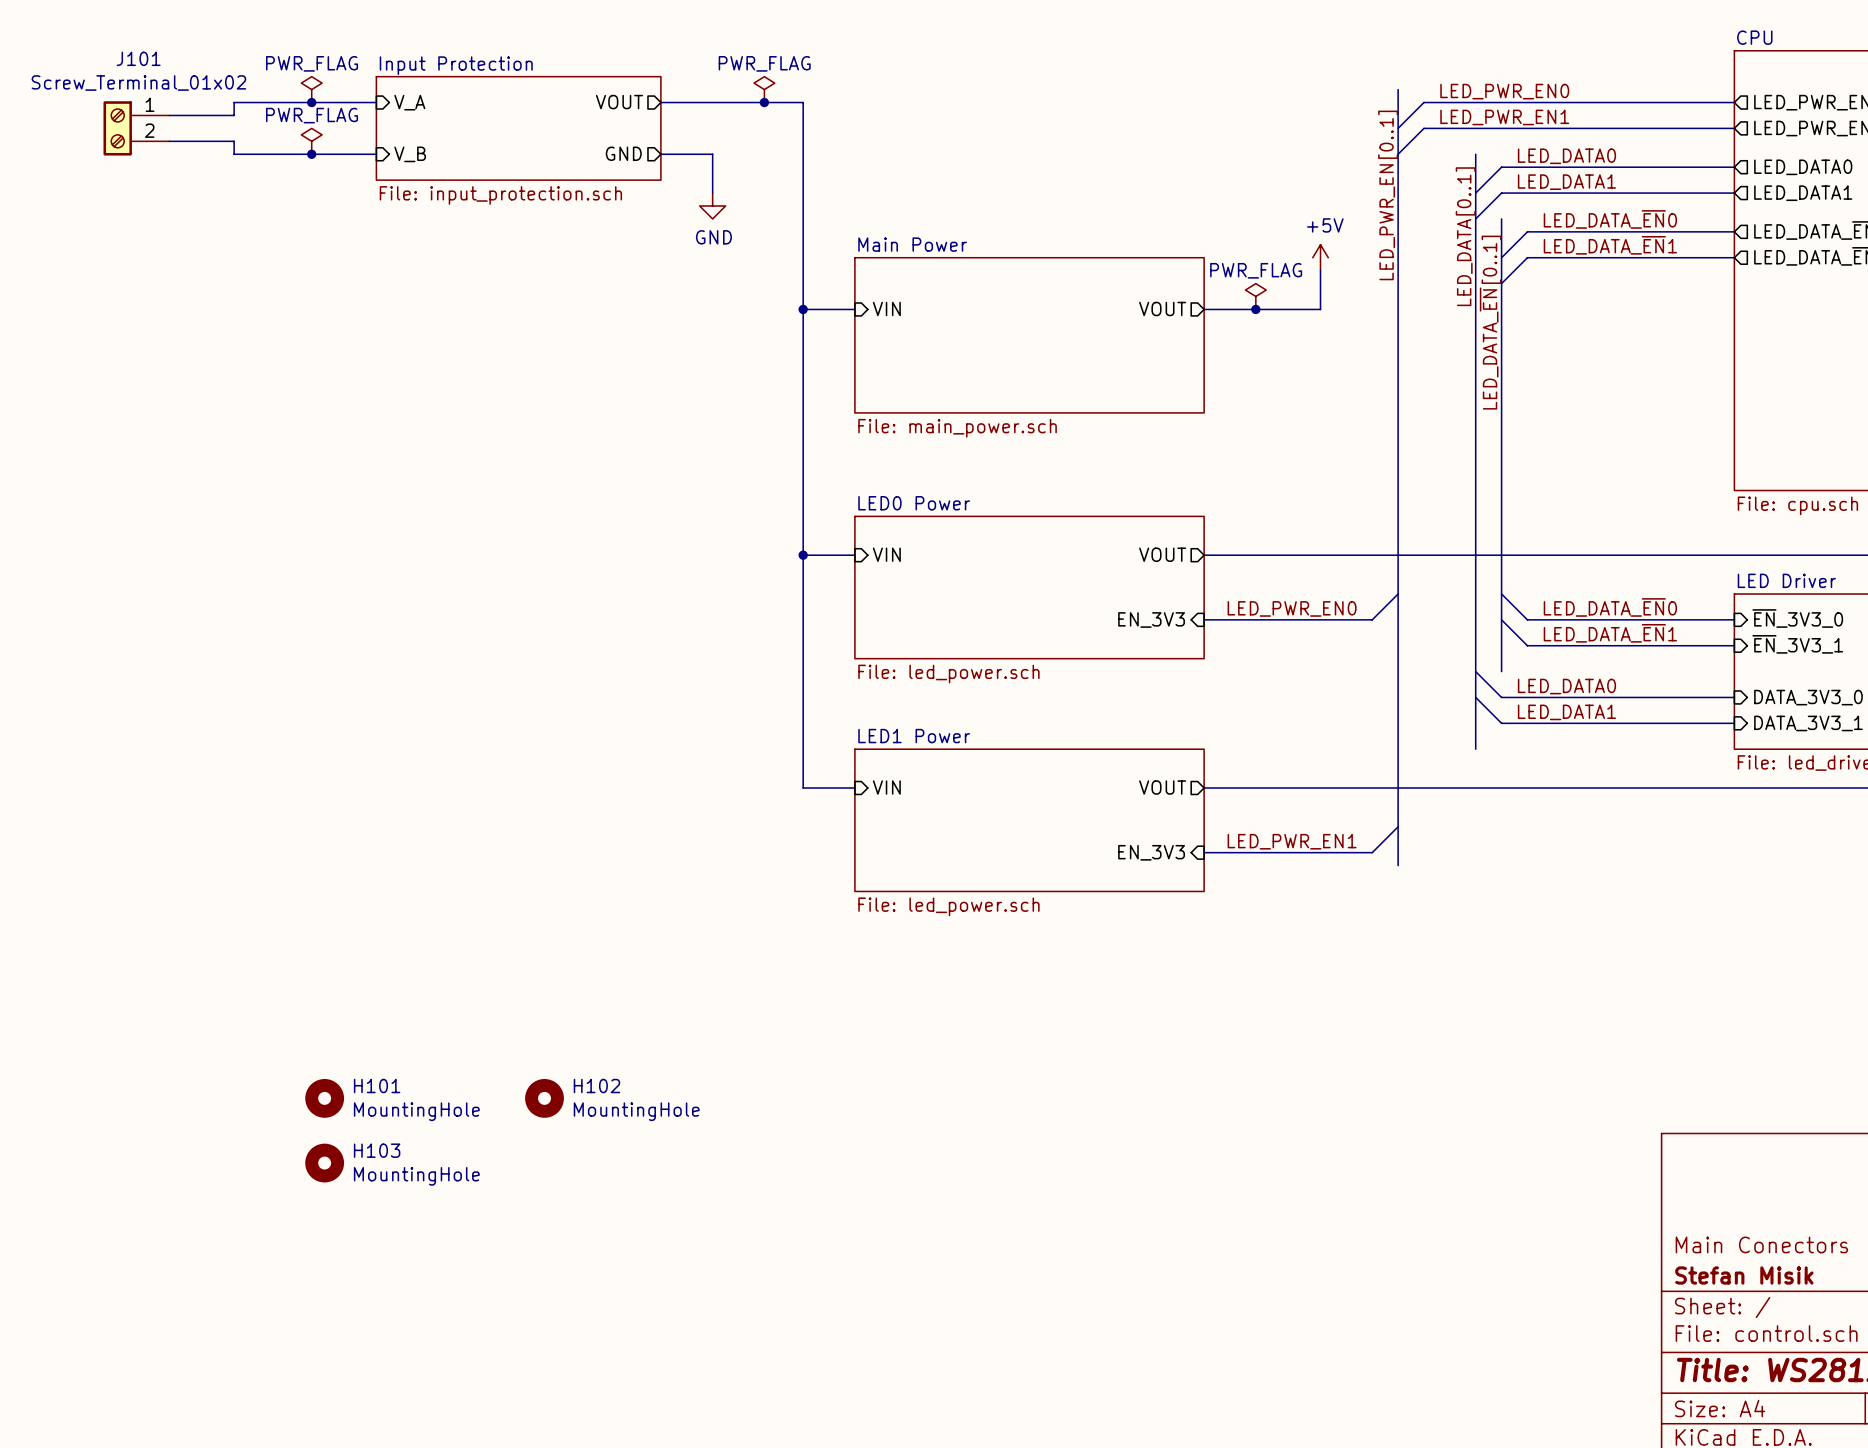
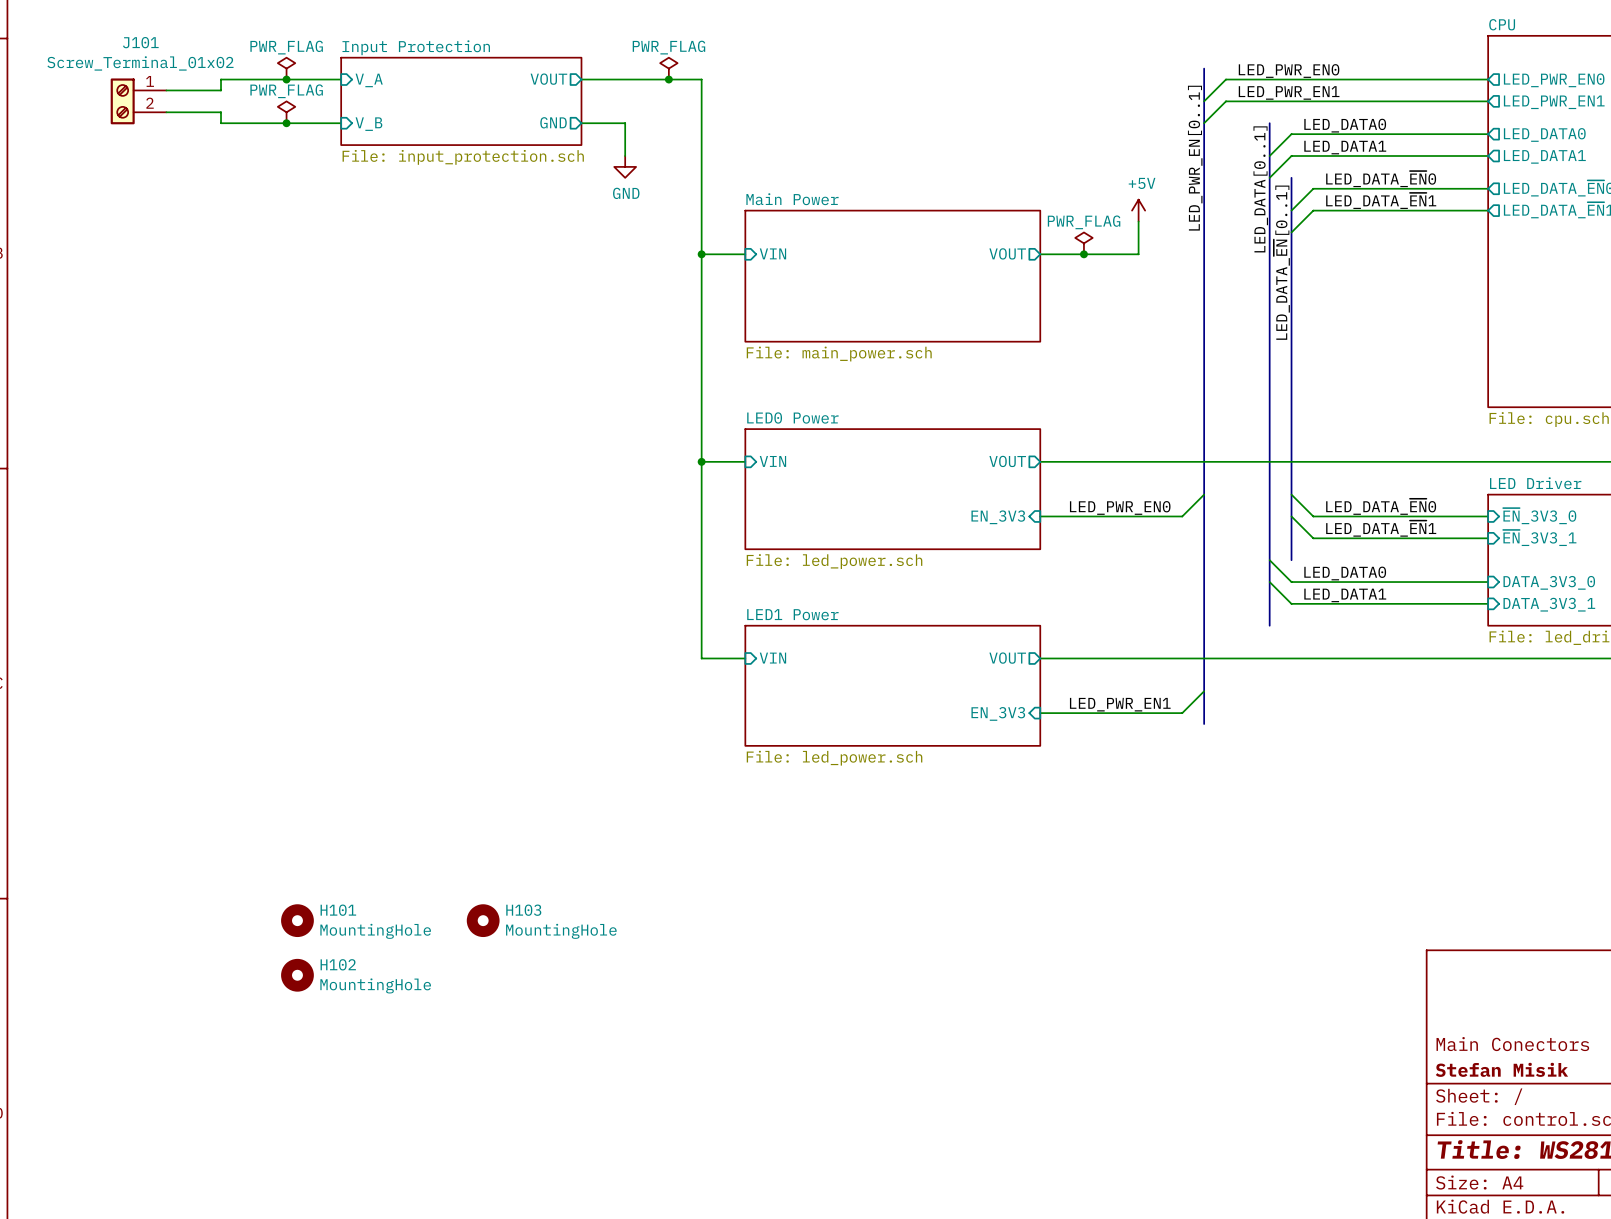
H102 name: H102 (596, 1086) -> H103 (523, 910)
H103 name: H103 (377, 1150) -> H102 (338, 964)

